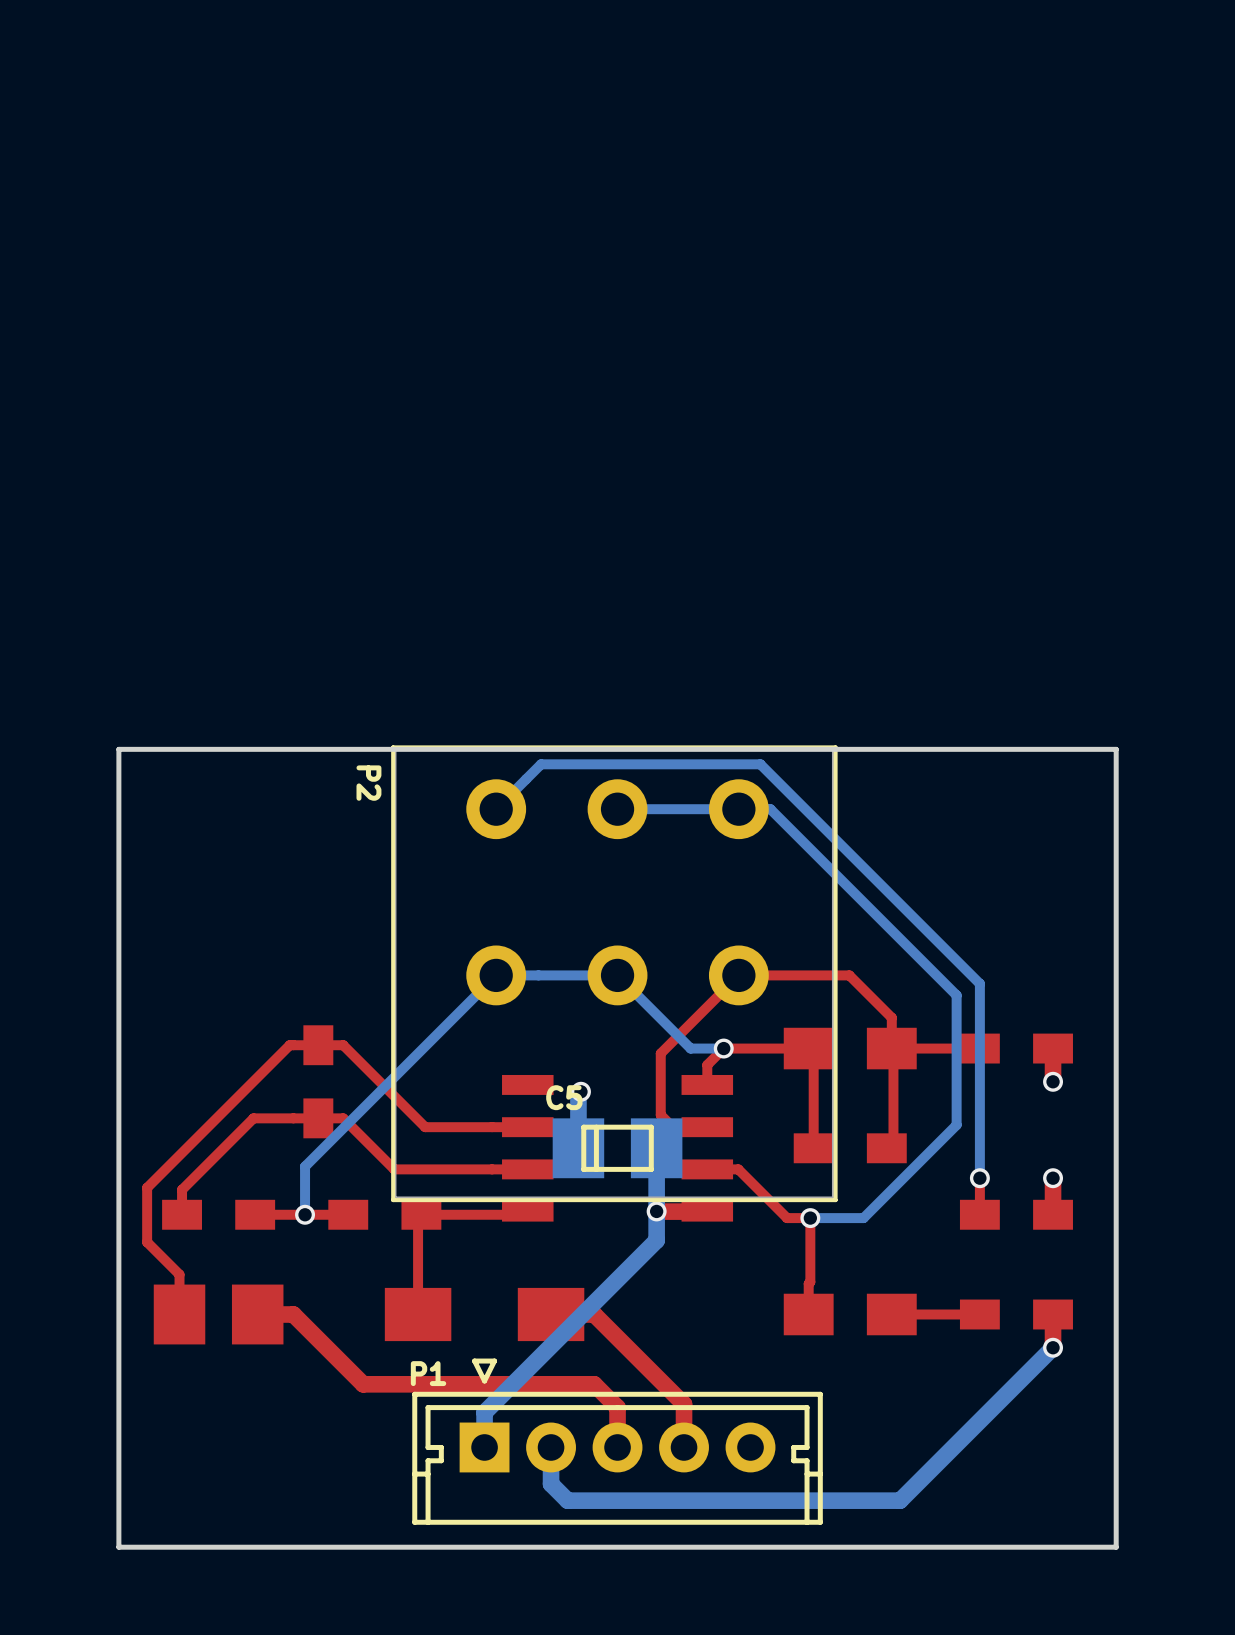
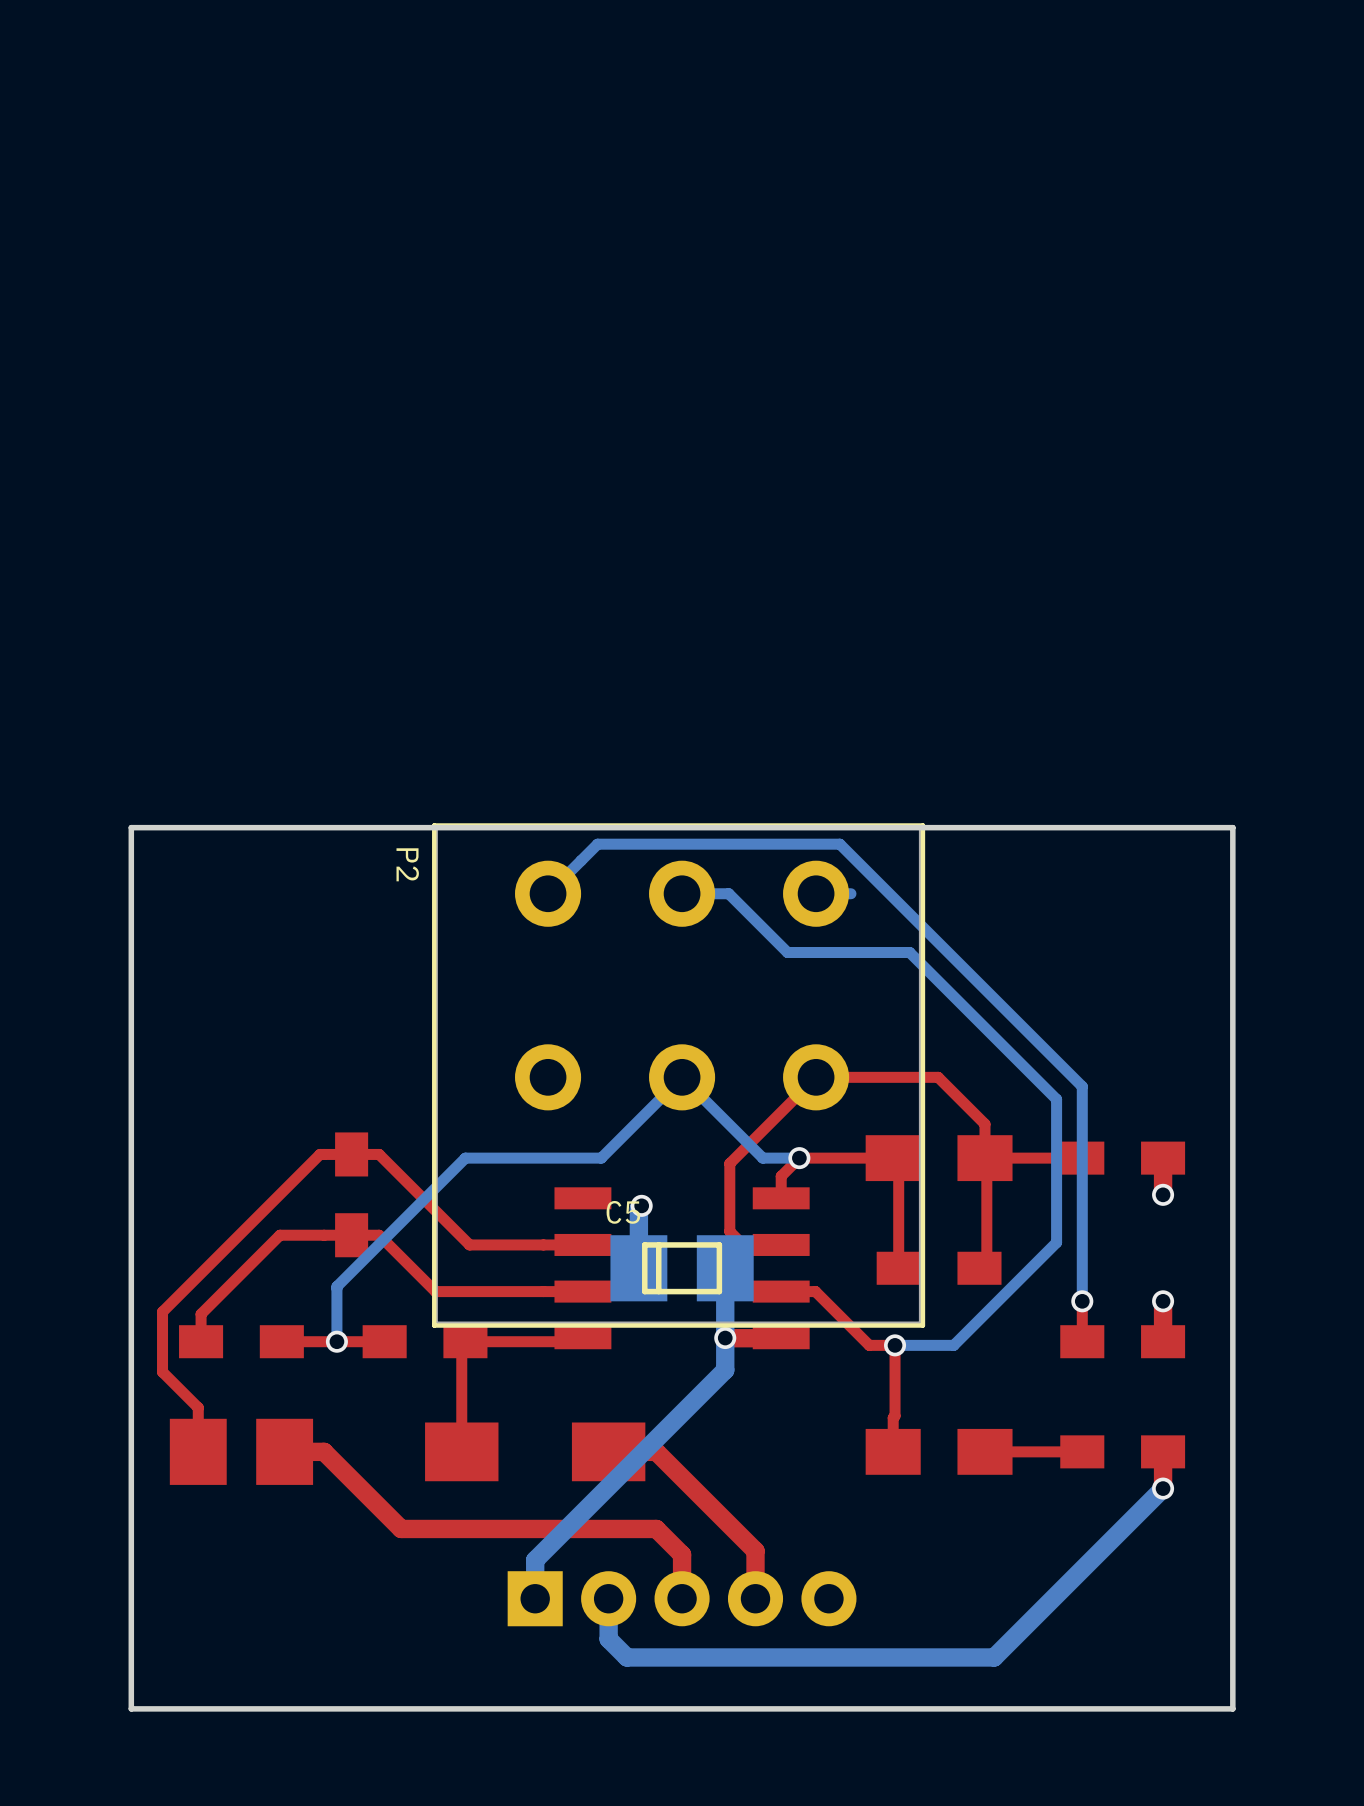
bottom track: (738, 809) (659, 809) -> (909, 952) (787, 952) (728, 893)
bottom track: (770, 809) (823, 862) -> none
bottom track: (617, 975) (496, 975) (305, 1166) -> (682, 1077) (601, 1158) (465, 1158) (336, 1288)
P1 side: bottom (617, 1441) -> top (682, 1598)

